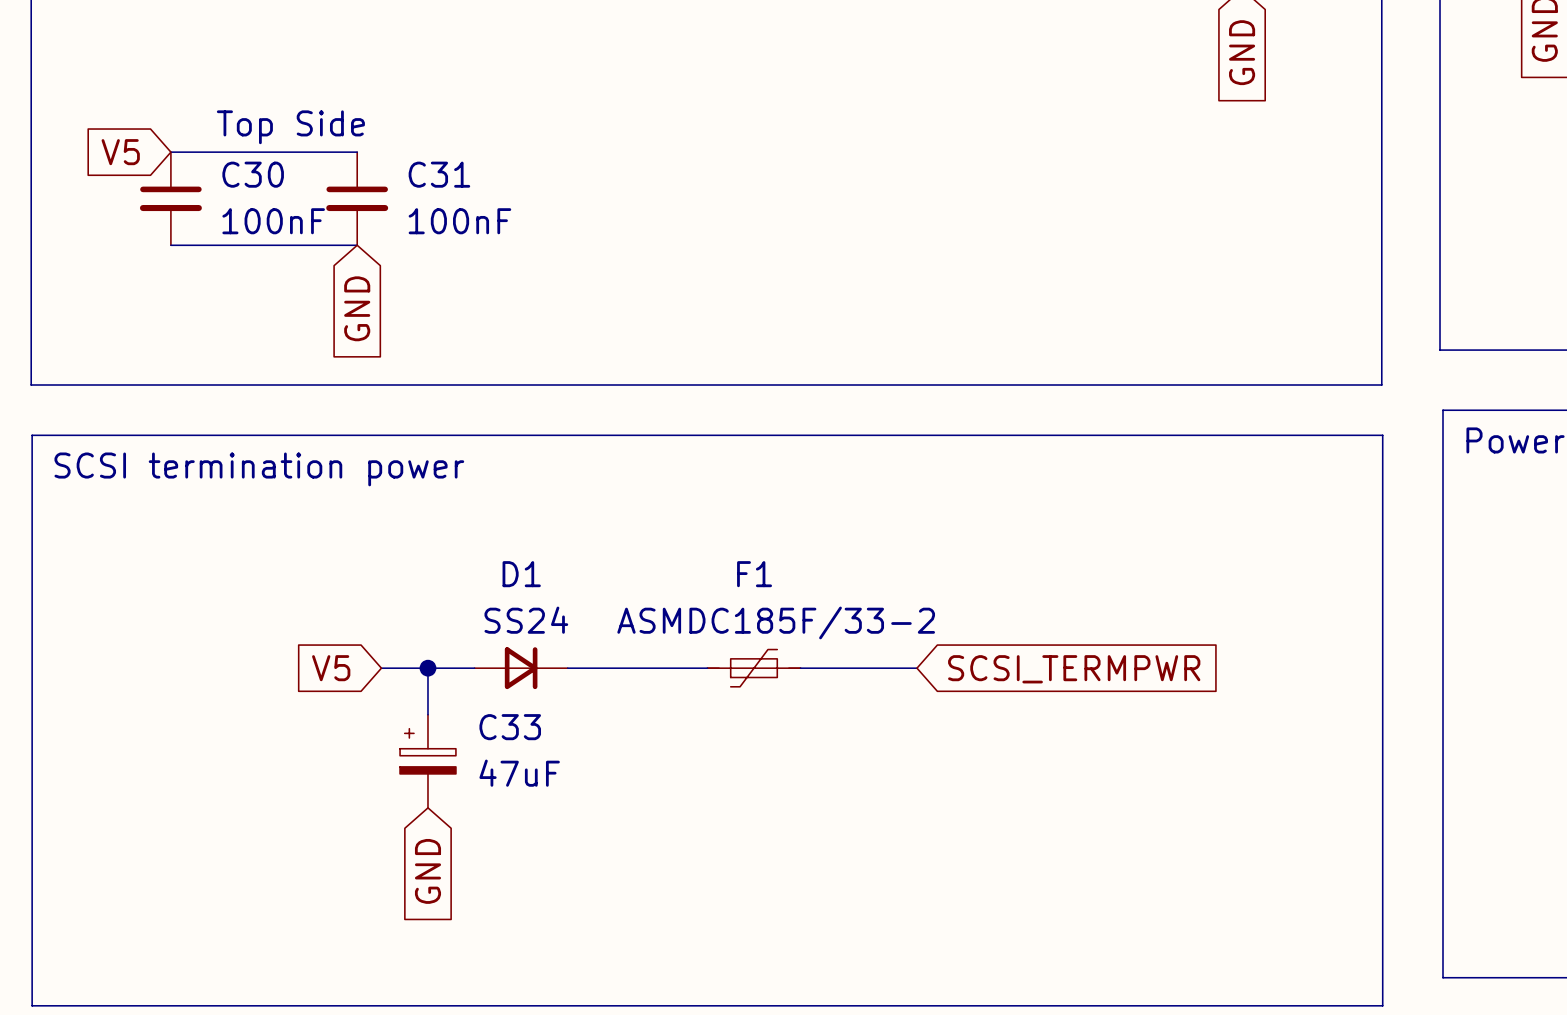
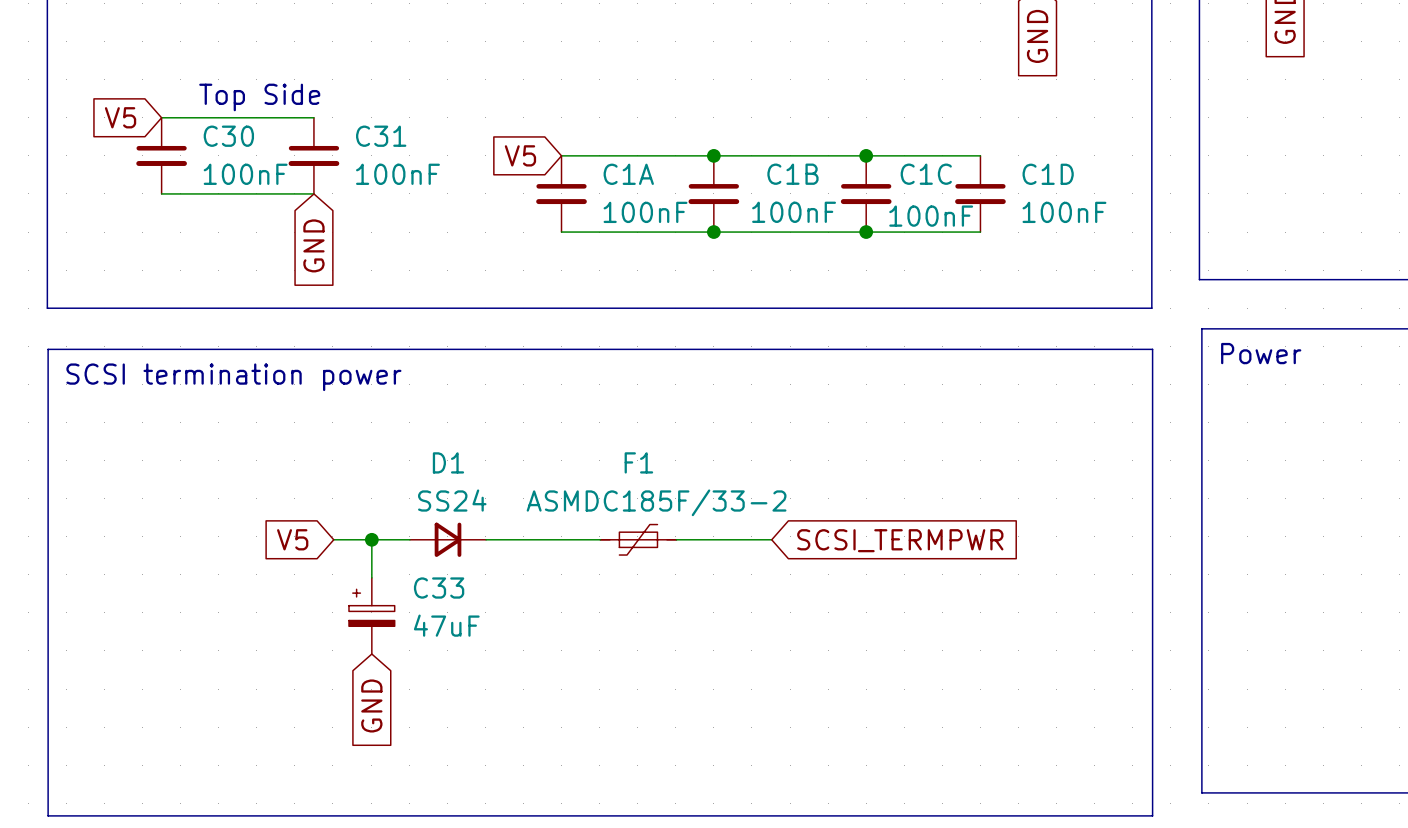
global label: none -> V5 (520, 155)
wire: none -> (561, 155) (980, 155)
junction: none -> (713, 155)
junction: none -> (866, 155)
C1A: none -> 100nF (561, 193)
C1B: none -> 100nF (713, 193)
C1C: none -> 100nF (866, 193)
C1D: none -> 100nF (980, 193)
wire: none -> (561, 232) (980, 232)
junction: none -> (713, 232)
junction: none -> (866, 232)

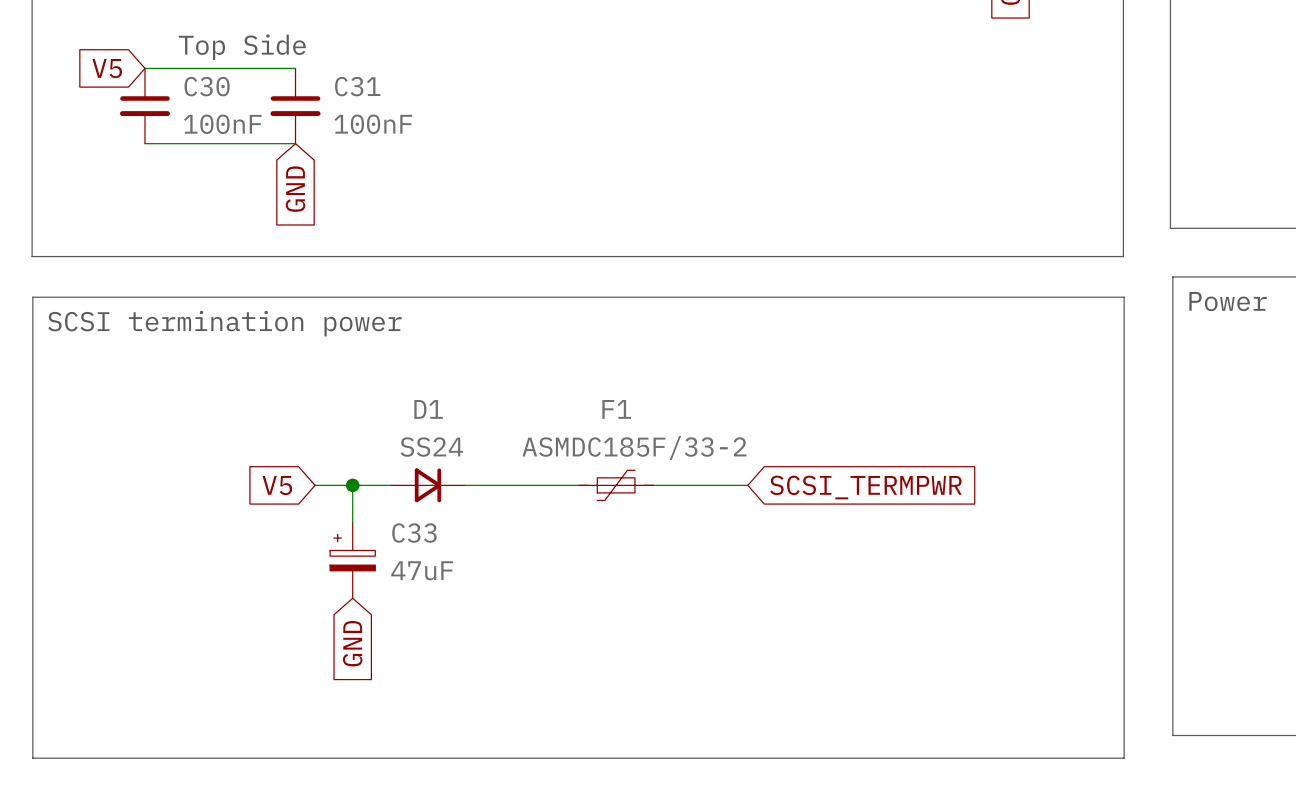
global label: V5 (520, 155) -> none
wire: (561, 155) (980, 155) -> none
junction: (713, 155) -> none
junction: (866, 155) -> none
C1A: 100nF (561, 193) -> none
C1B: 100nF (713, 193) -> none
C1C: 100nF (866, 193) -> none
C1D: 100nF (980, 193) -> none
wire: (561, 232) (980, 232) -> none
junction: (713, 232) -> none
junction: (866, 232) -> none

